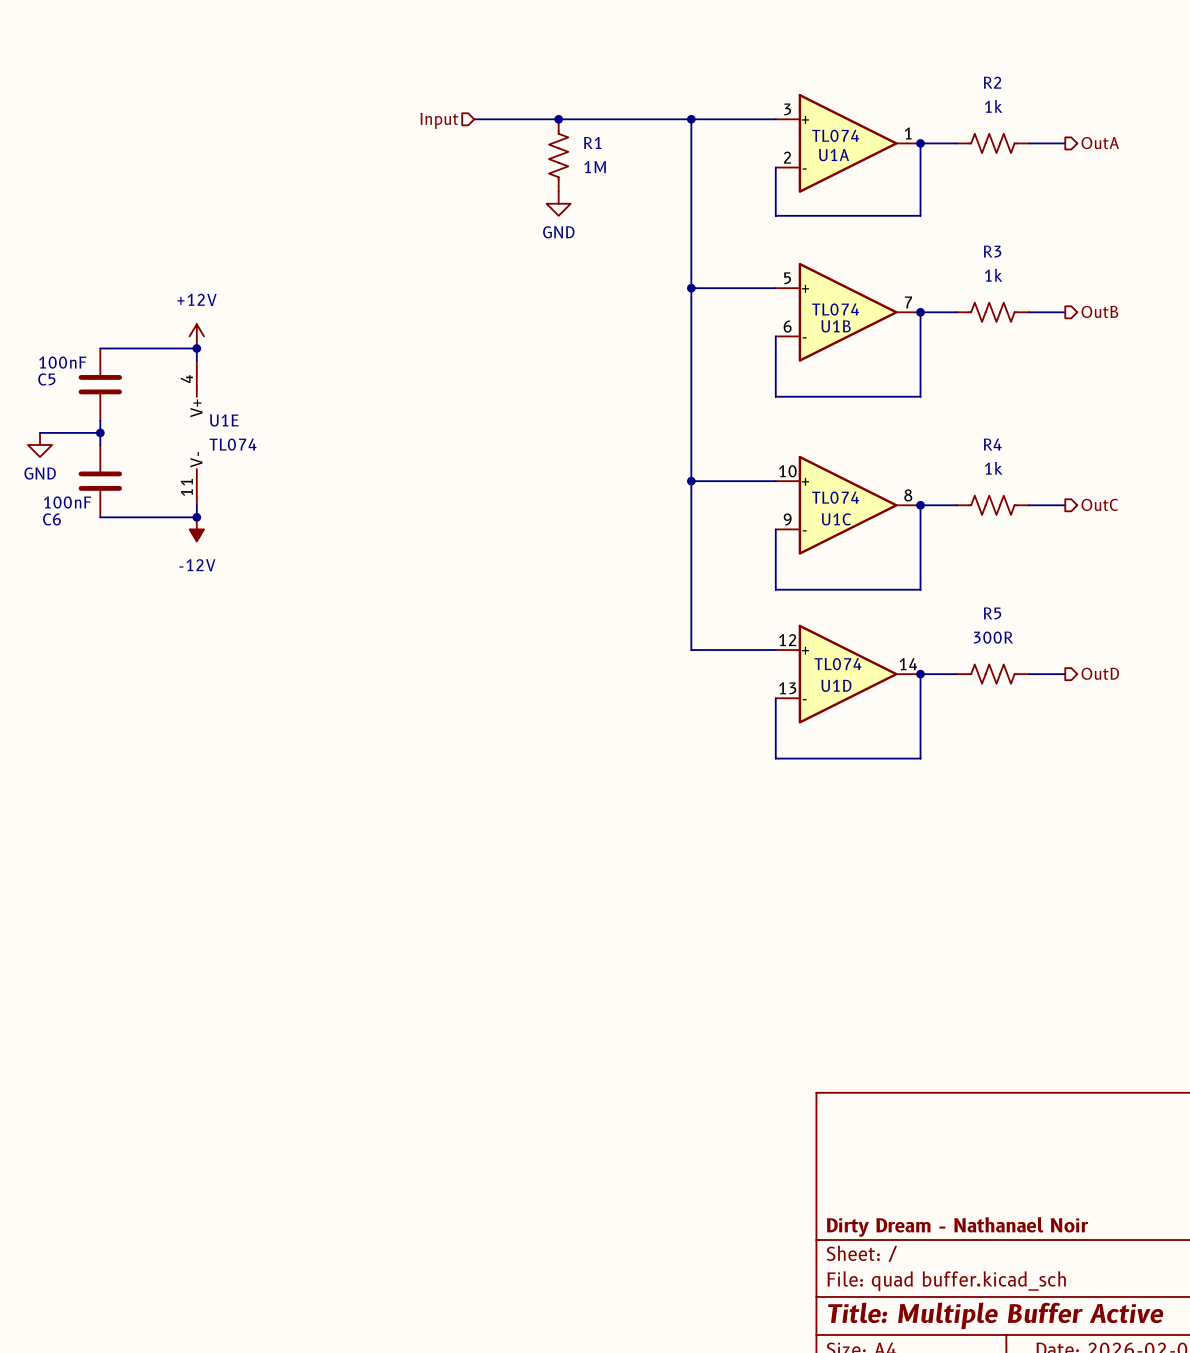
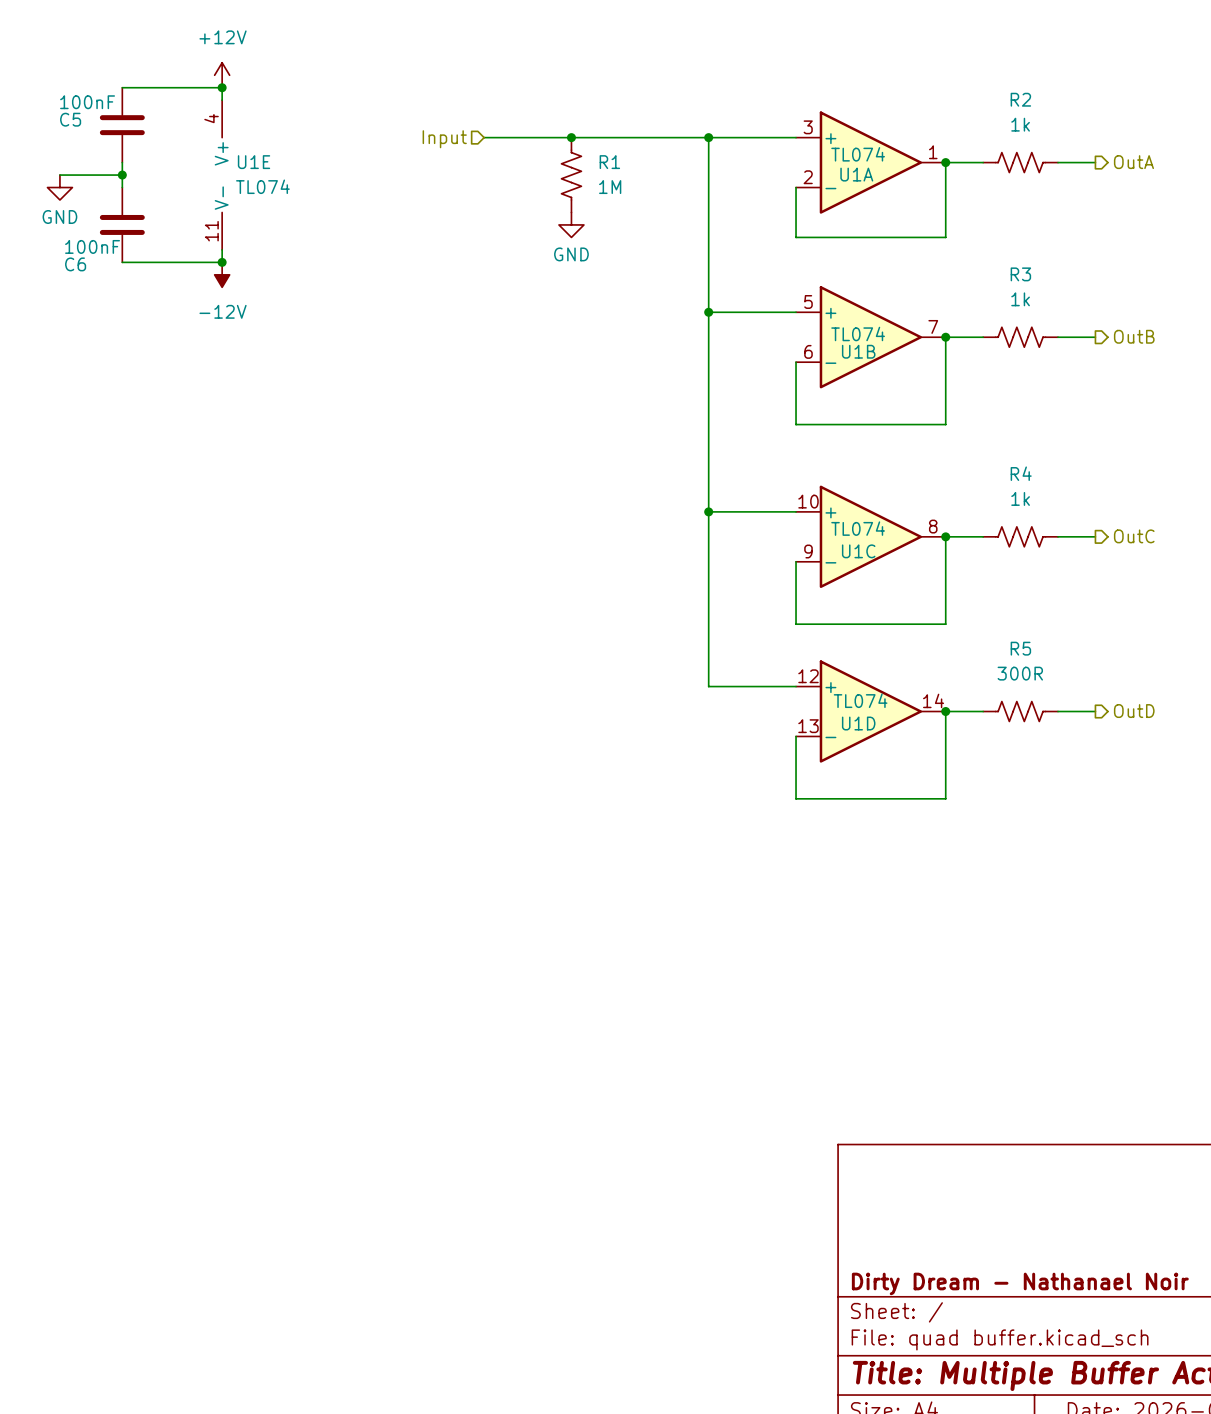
power symbol: none -> +12V (222, 75)
wire: none -> (122, 87) (222, 87) (222, 100)
junction: none -> (222, 87)
wire: none -> (122, 162) (122, 187)
wire: none -> (59, 175) (122, 175)
junction: none -> (122, 175)
power symbol: none -> GND (59, 187)
wire: none -> (222, 249) (222, 262) (122, 262)
junction: none -> (222, 262)
power symbol: none -> -12V (222, 274)
power symbol: +12V (196, 336) -> none
wire: (100, 348) (196, 348) (196, 360) -> none
junction: (196, 348) -> none
C5 position: (100, 384) -> (122, 125)
wire: (100, 420) (100, 444) -> none
wire: (40, 432) (100, 432) -> none
junction: (100, 432) -> none
U1E position: (196, 432) -> (222, 175)
power symbol: GND (40, 444) -> none
C6 position: (100, 481) -> (122, 224)
wire: (196, 505) (196, 517) (100, 517) -> none
junction: (196, 517) -> none
power symbol: -12V (196, 529) -> none

